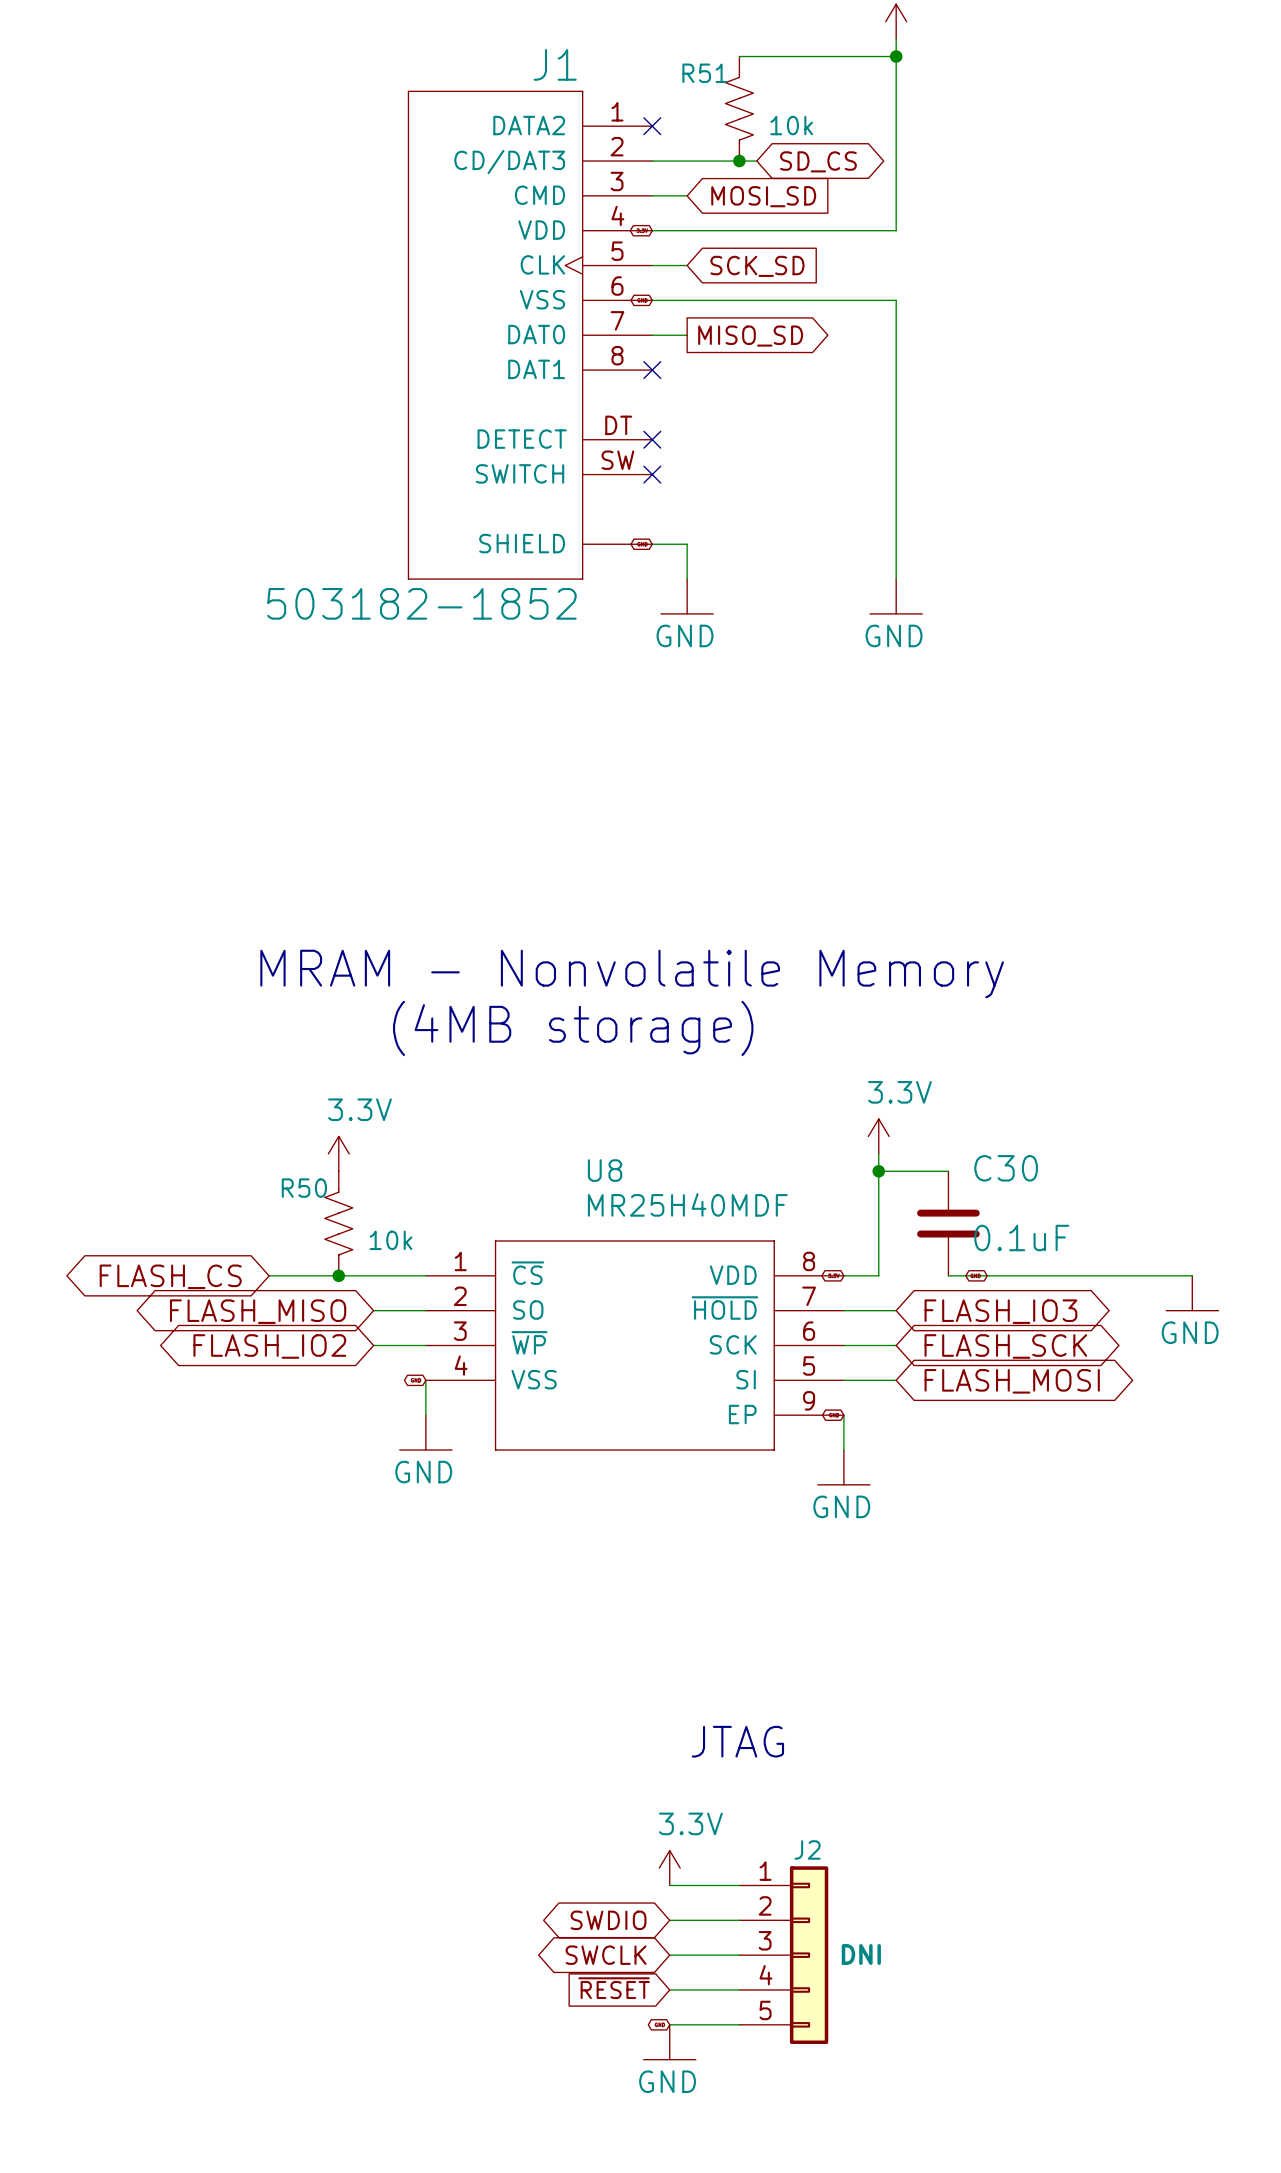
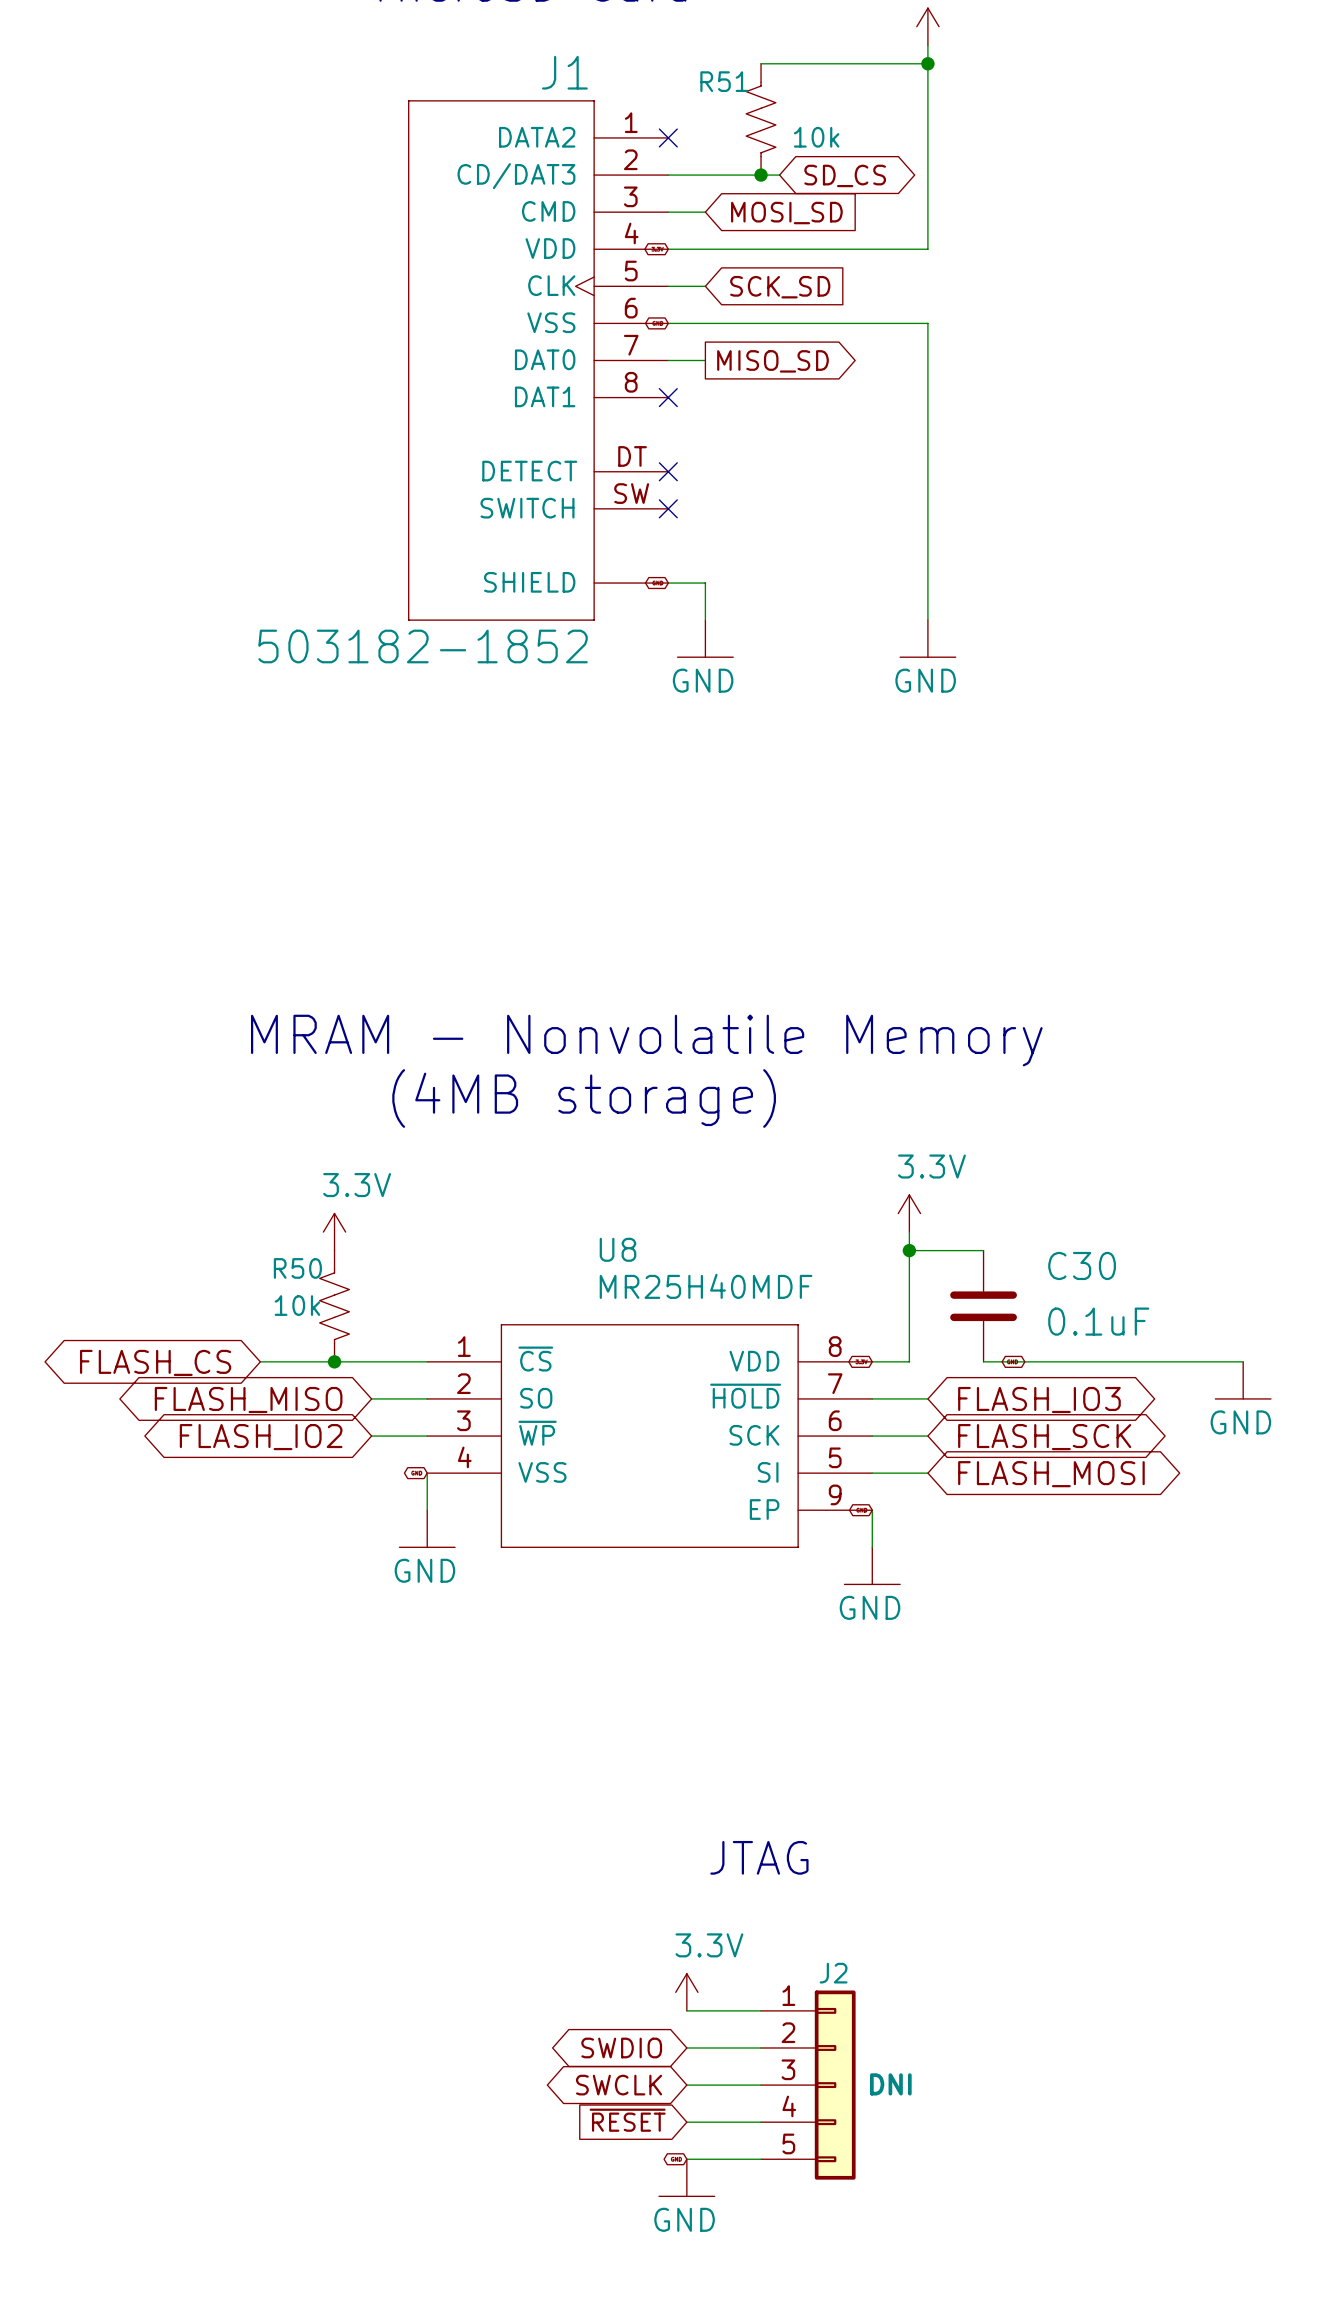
C30 name position: C30 (1006, 1168) -> C30 (1082, 1265)
C30 value position: 0.1uF (1021, 1238) -> 0.1uF (1098, 1321)
R50 value position: 10k (391, 1240) -> 10k (297, 1305)

